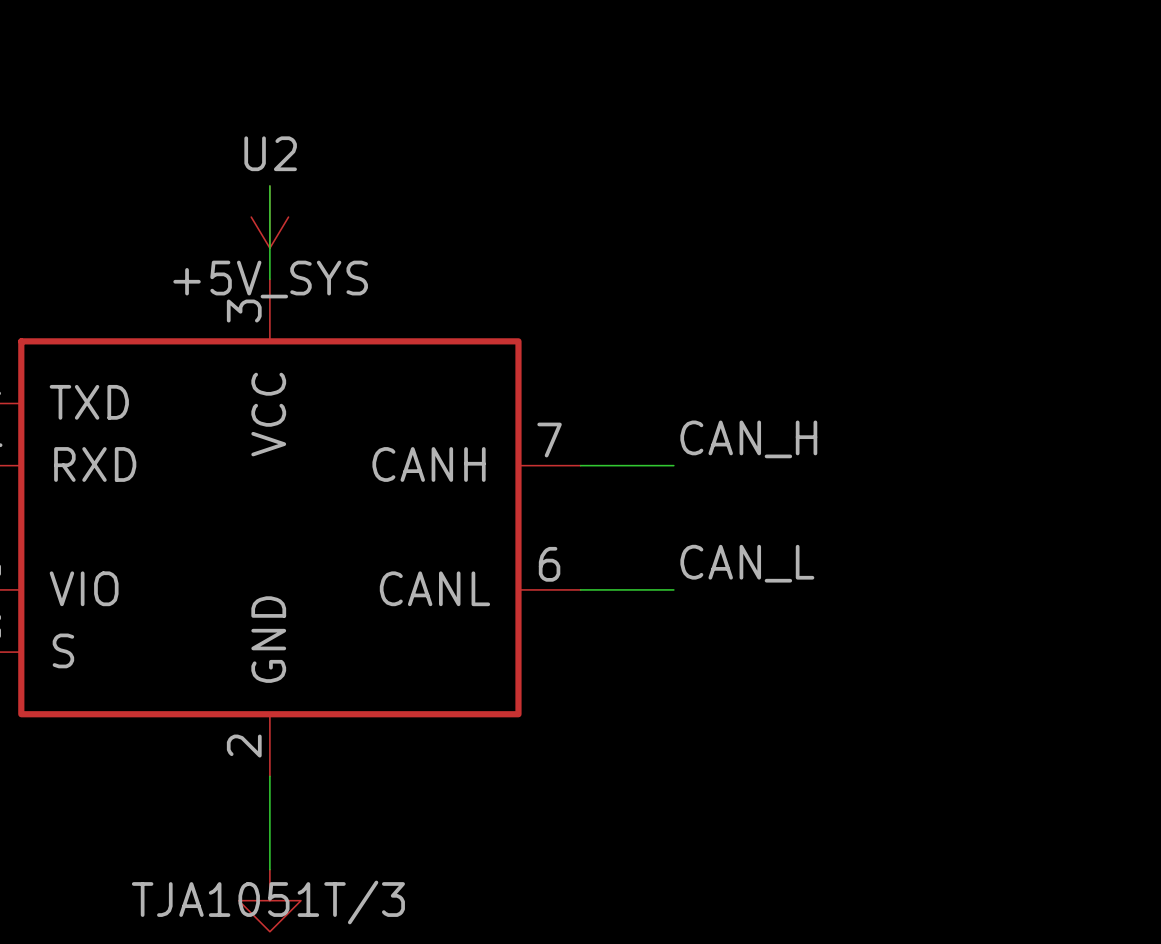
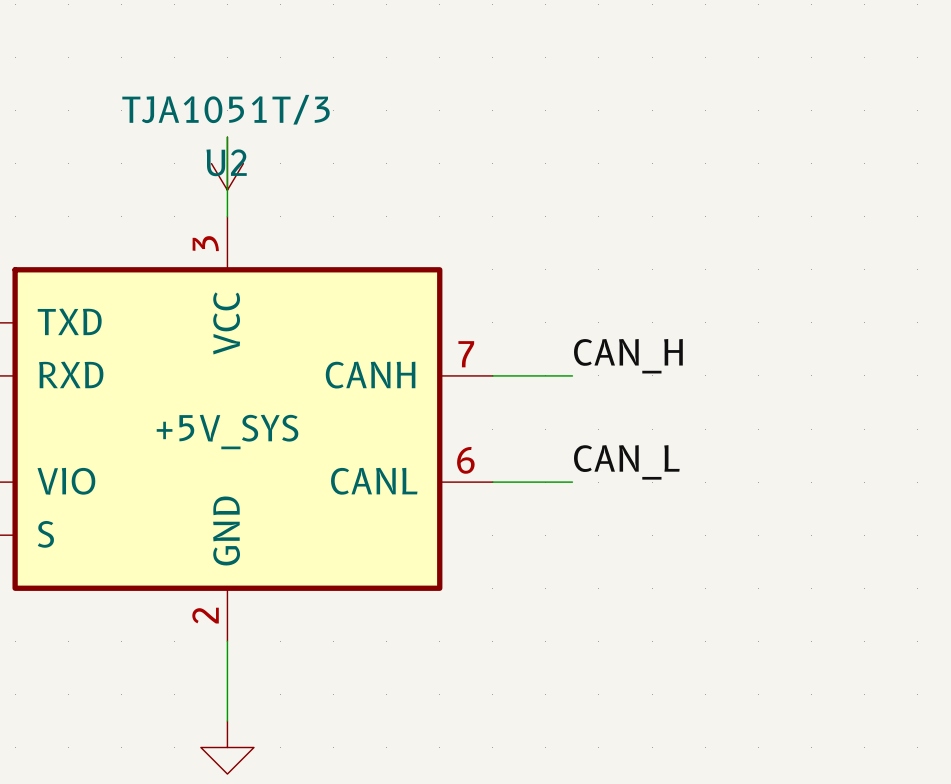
U2 name position: U2 (270, 153) -> U2 (226, 162)
power symbol text position: +5V_SYS (270, 279) -> +5V_SYS (227, 432)
U2 value position: TJA1051T/3 (268, 902) -> TJA1051T/3 (226, 109)

